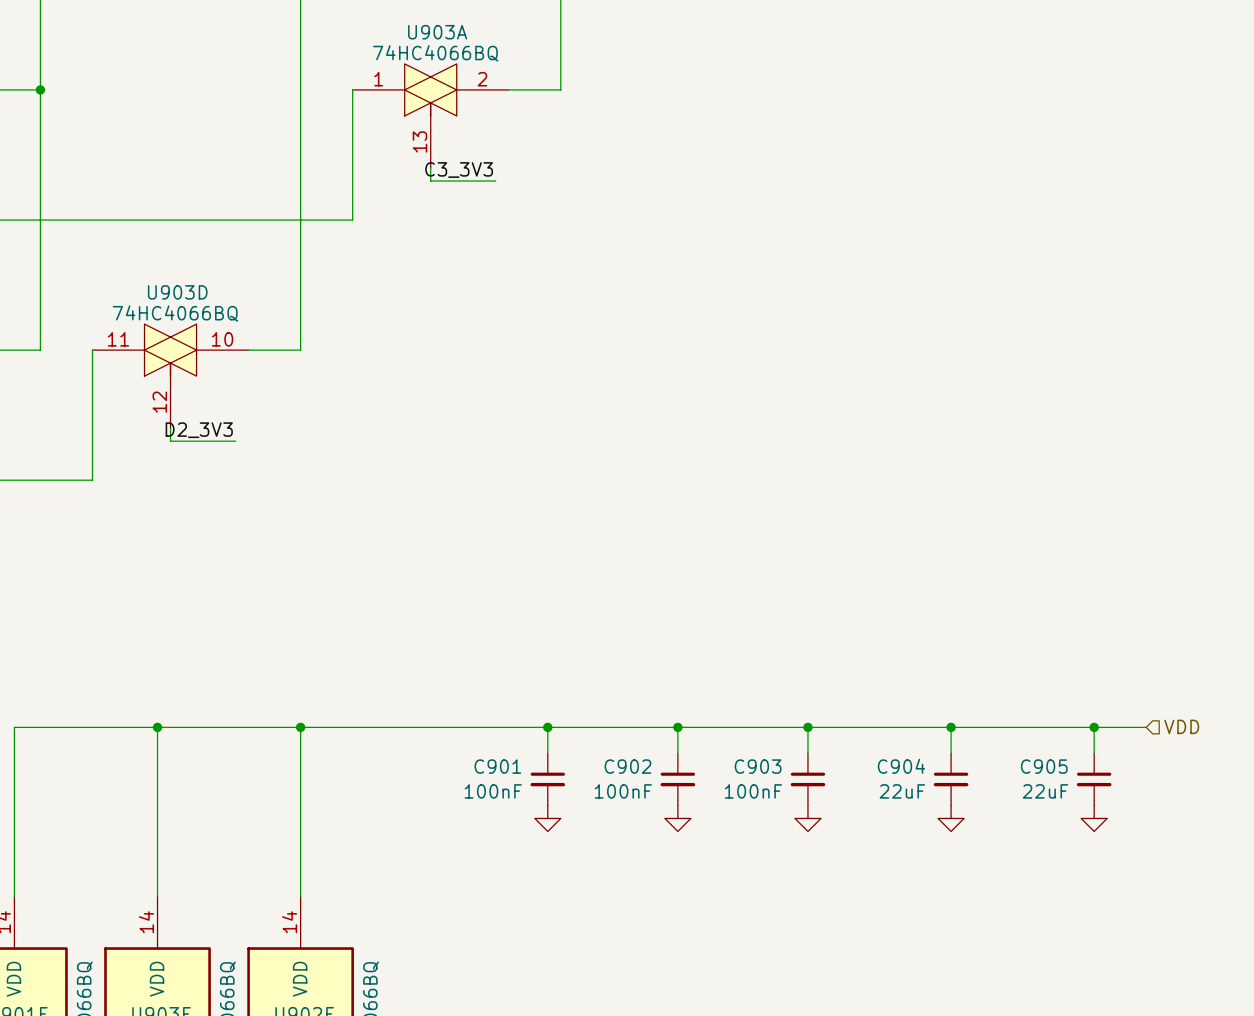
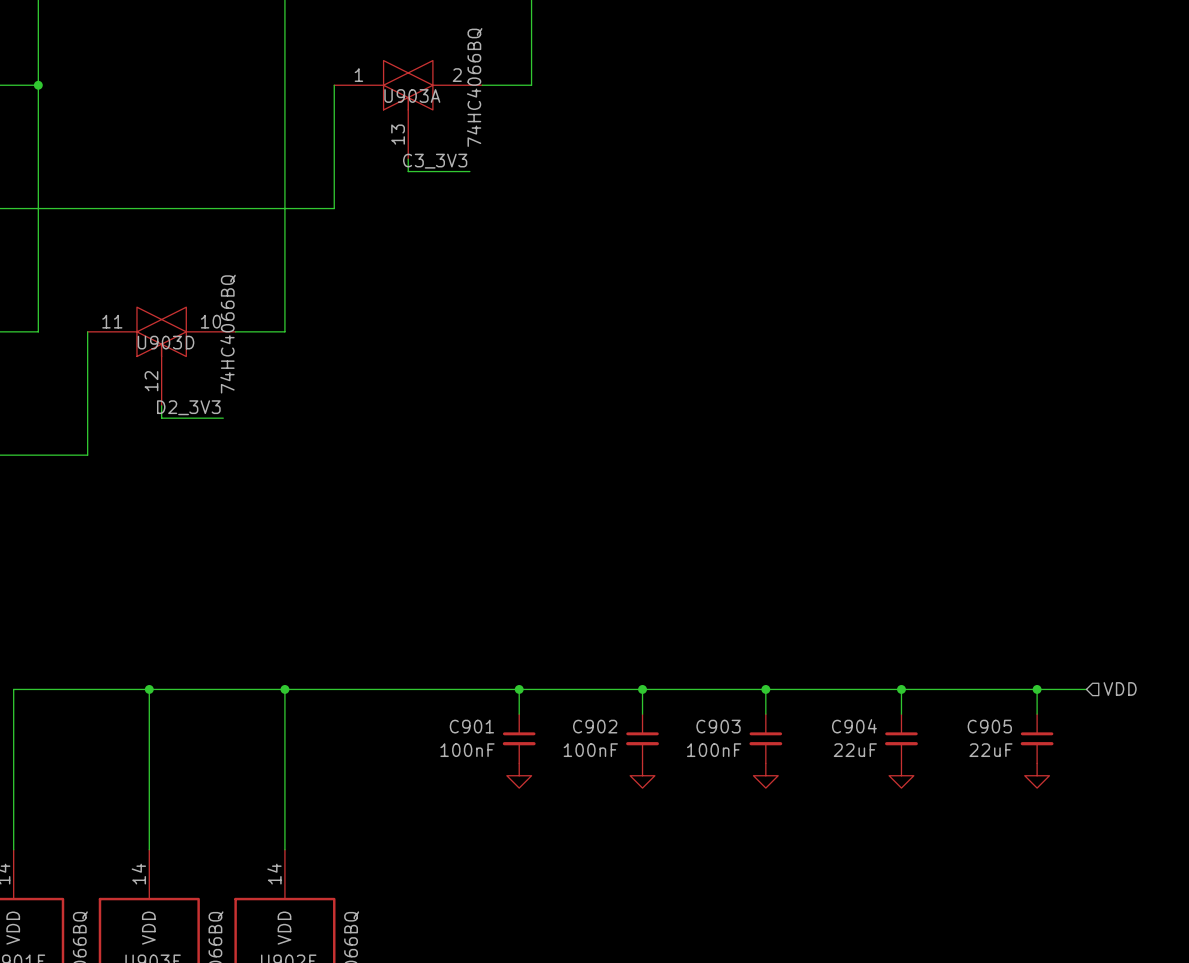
U903A name position: U903A (437, 32) -> U903A (412, 95)
U903A value rotation: 0° (435, 53) -> 90° counterclockwise (474, 87)
U903D name position: U903D (177, 292) -> U903D (166, 342)
U903D value rotation: 0° (175, 313) -> 90° counterclockwise (228, 334)

